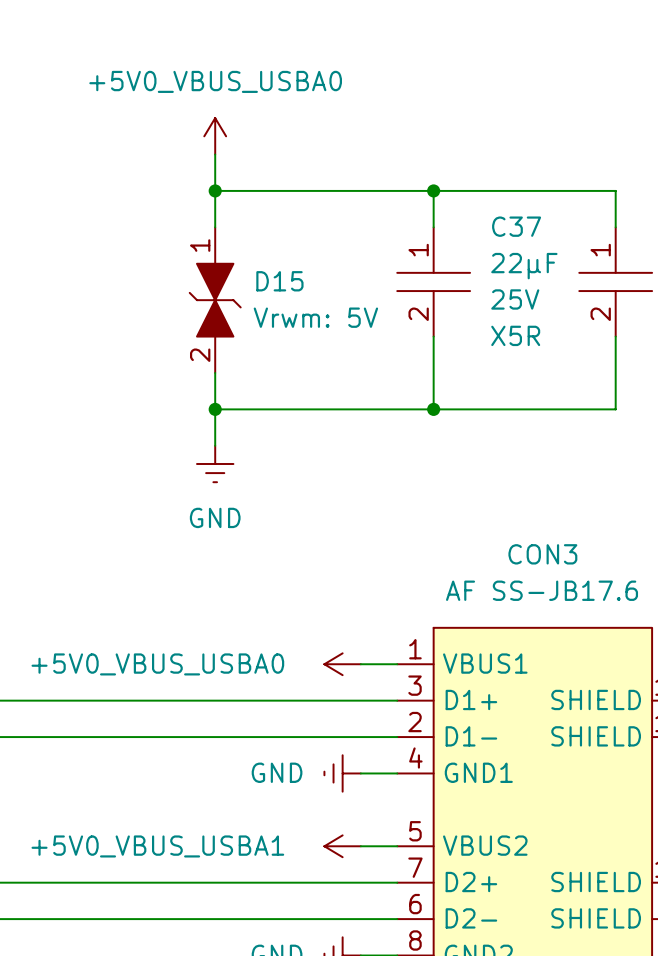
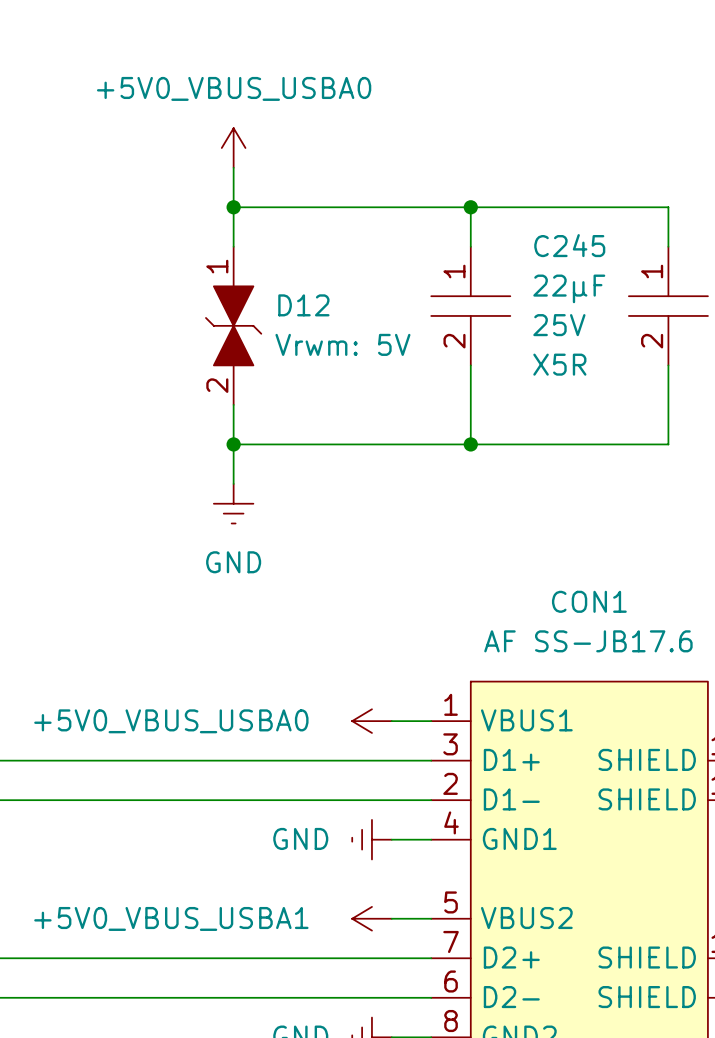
C37 name: C37 (516, 226) -> C245 (569, 245)
D15 name: D15 (279, 281) -> D12 (303, 305)
CON3 name: CON3 (542, 554) -> CON1 (589, 601)

